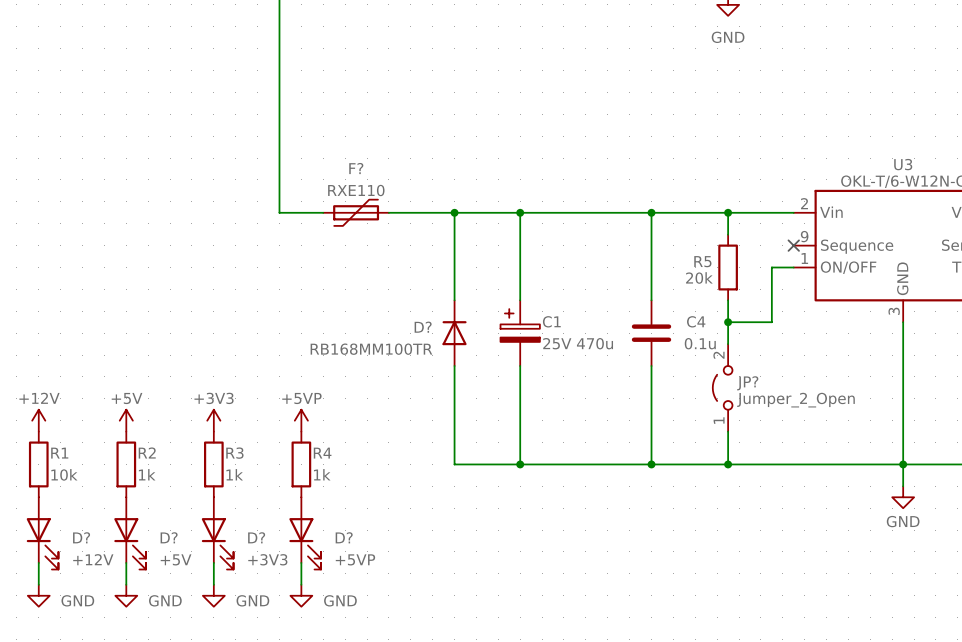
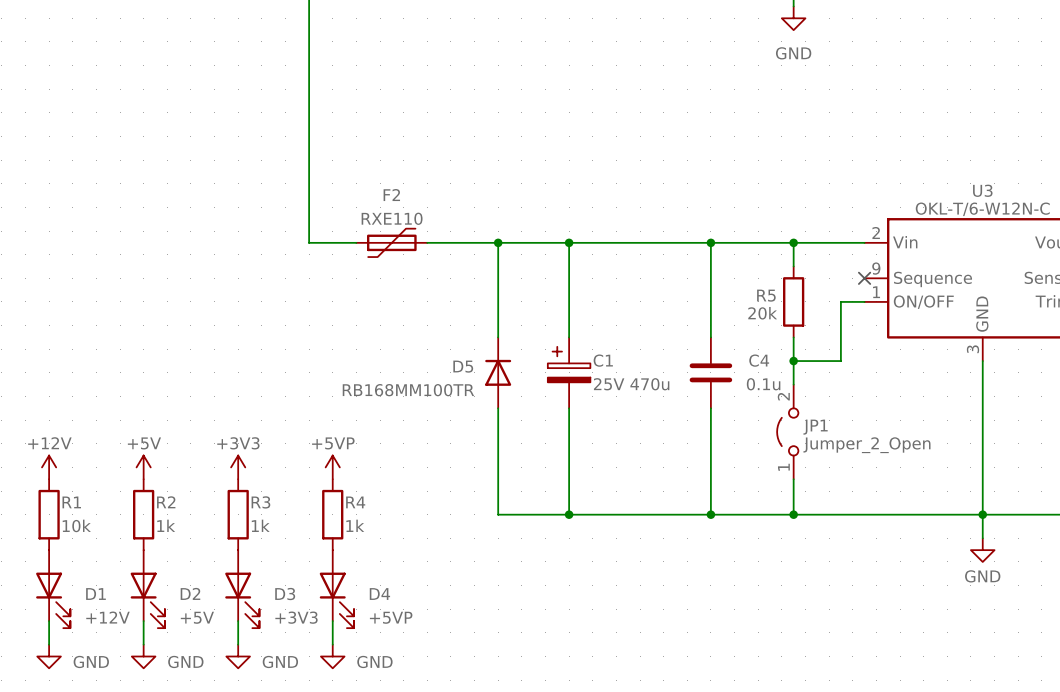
F? name: F? (356, 168) -> F2 (391, 195)
D? name: D? (423, 327) -> D5 (463, 366)
JP? name: JP? (747, 383) -> JP1 (815, 427)
D? name: D? (81, 537) -> D1 (95, 594)
D? name: D? (169, 537) -> D2 (190, 593)
D? name: D? (256, 537) -> D3 (285, 594)
D? name: D? (344, 537) -> D4 (379, 594)

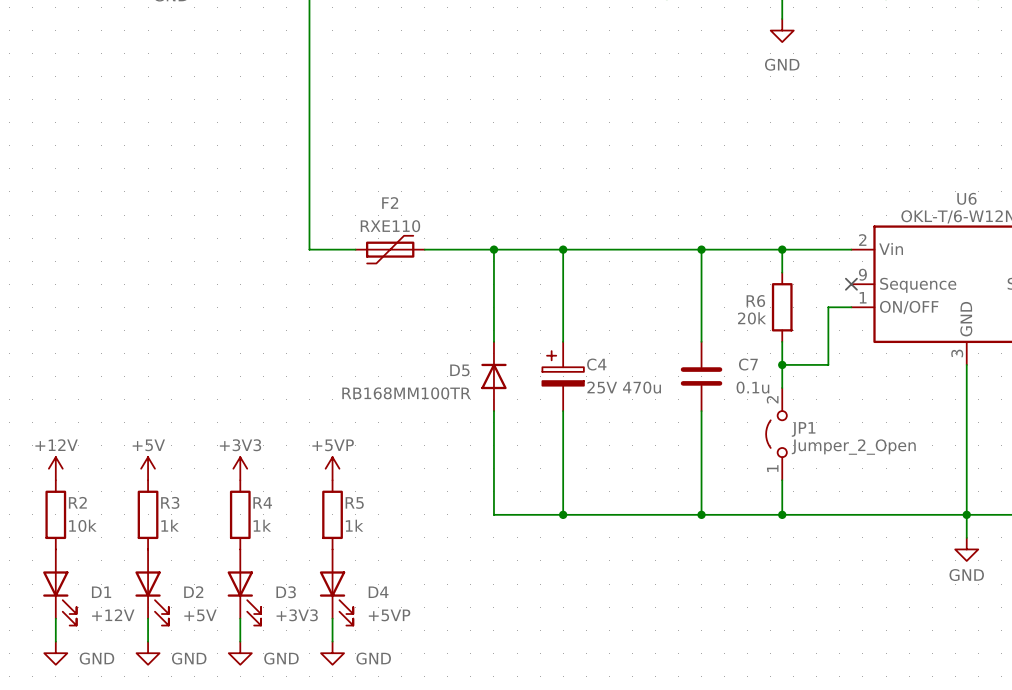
U3 name: U3 (982, 190) -> U6 (966, 198)
R5 name: R5 (766, 295) -> R6 (755, 301)
C1 name: C1 (603, 360) -> C4 (596, 364)
C4 name: C4 (759, 360) -> C7 (748, 364)
R1 name: R1 (71, 502) -> R2 (77, 502)
R2 name: R2 (166, 502) -> R3 (170, 502)
R3 name: R3 (260, 502) -> R4 (262, 502)
R4 name: R4 (355, 502) -> R5 (354, 502)

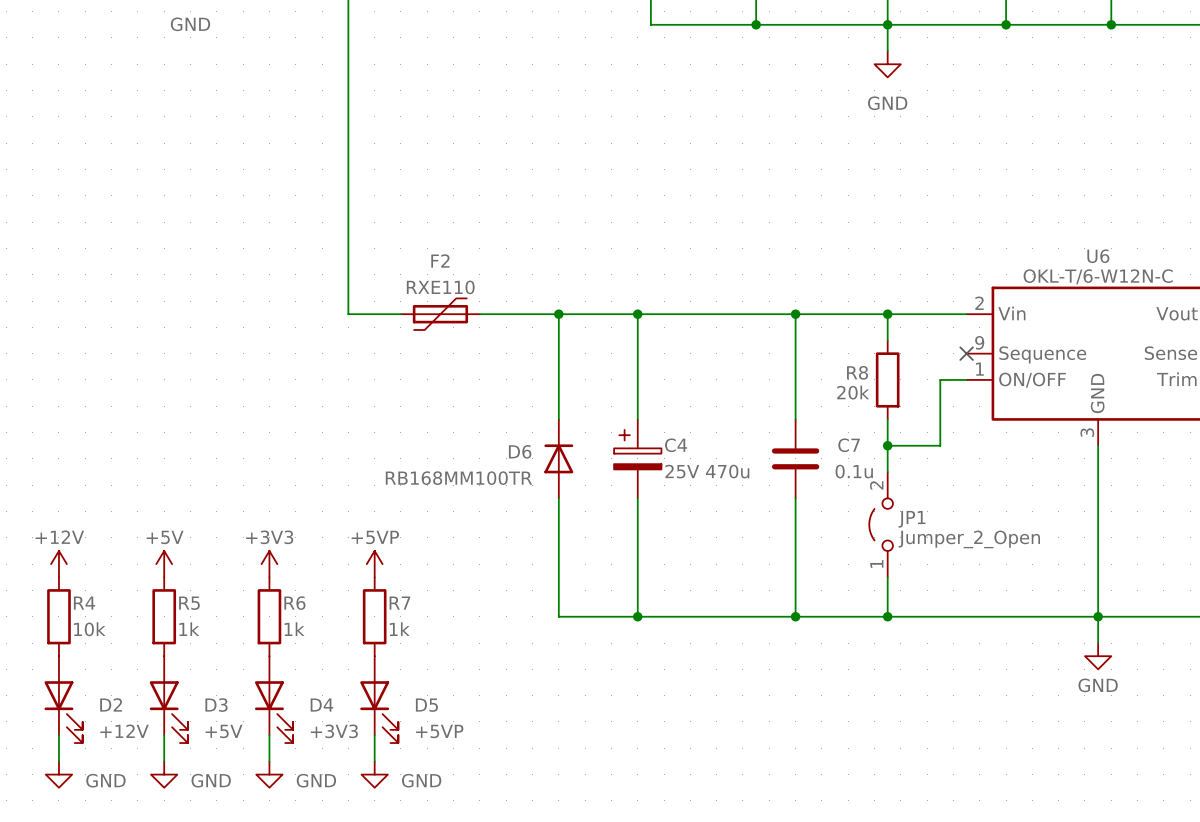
R6 name: R6 (755, 301) -> R8 (857, 372)
D5 name: D5 (459, 370) -> D6 (520, 451)
R2 name: R2 (77, 502) -> R4 (84, 603)
R3 name: R3 (170, 502) -> R5 (189, 603)
R4 name: R4 (262, 502) -> R6 (294, 603)
R5 name: R5 (354, 502) -> R7 (399, 603)
D1 name: D1 (101, 592) -> D2 (111, 704)
D2 name: D2 (193, 592) -> D3 (216, 705)
D3 name: D3 (286, 592) -> D4 (321, 705)
D4 name: D4 (378, 592) -> D5 (426, 705)

